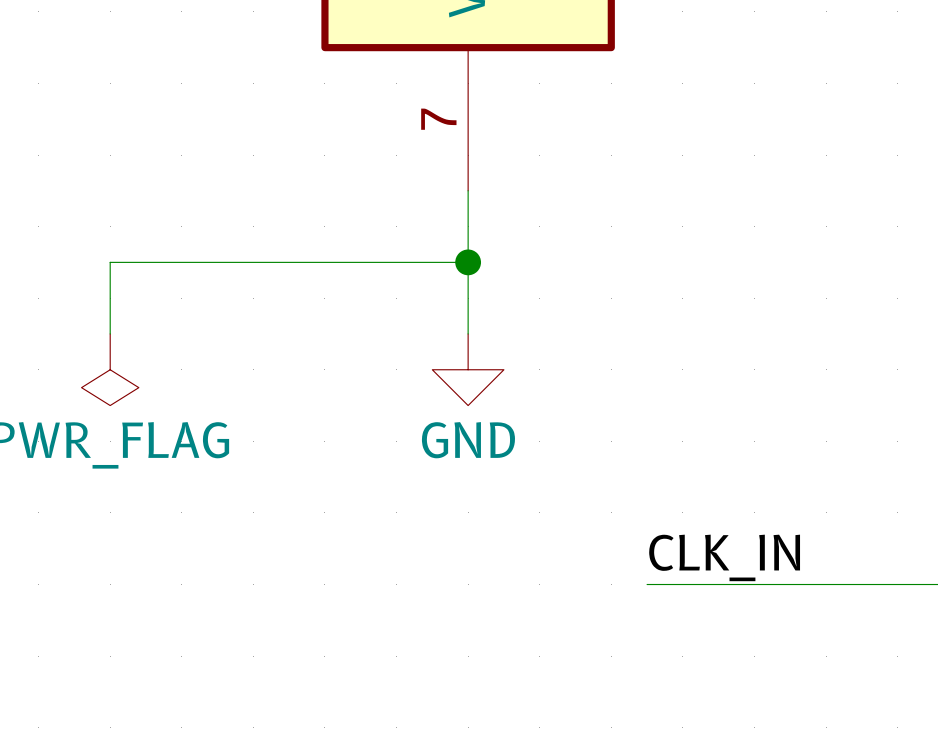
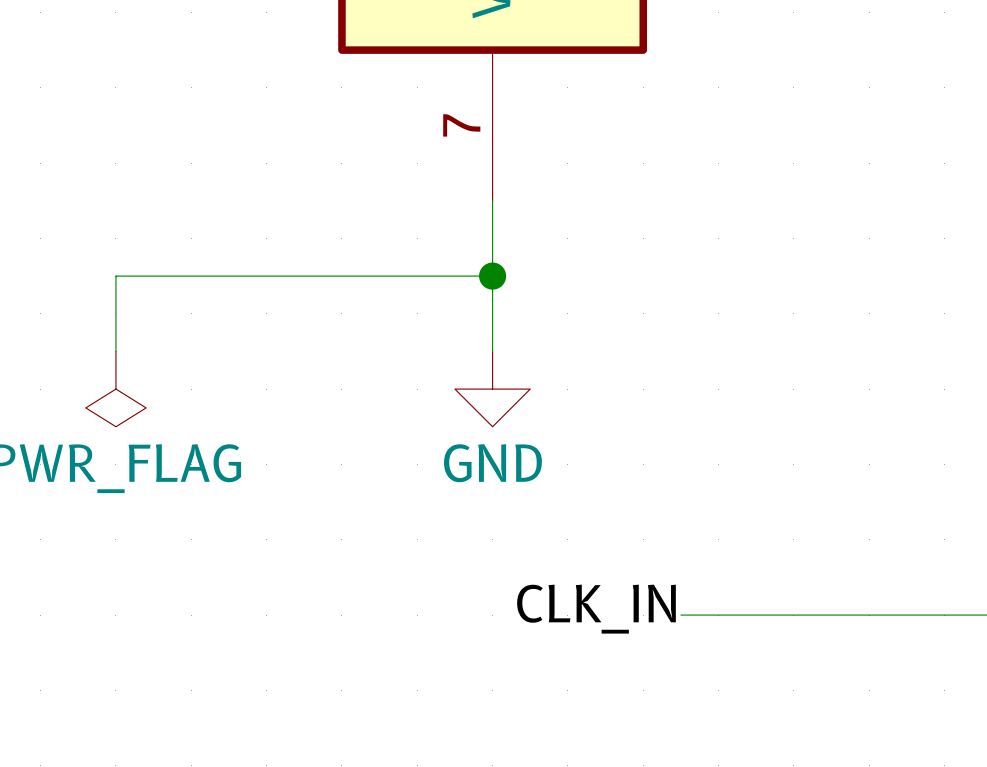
label position: CLK_IN (724, 557) -> CLK_IN (596, 609)

